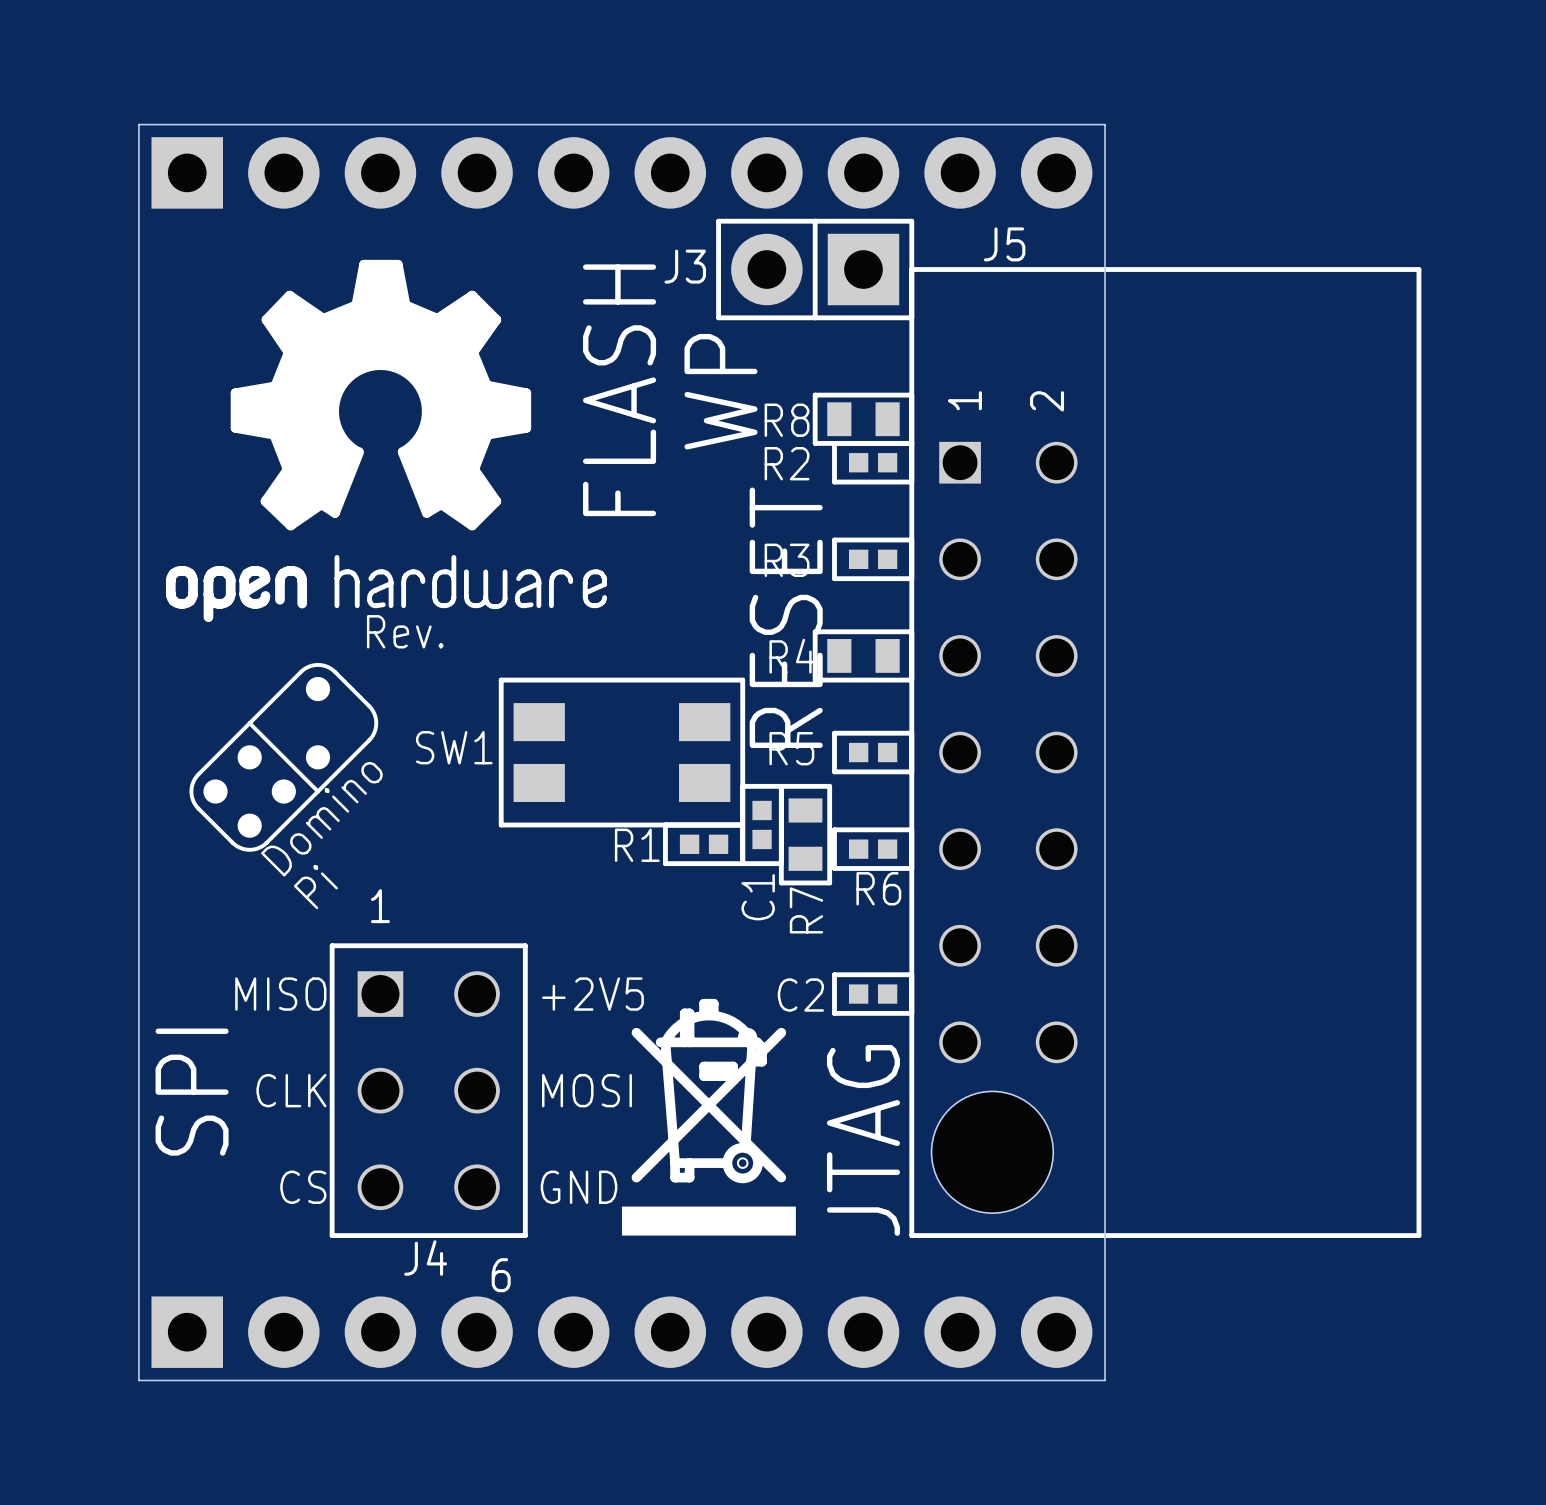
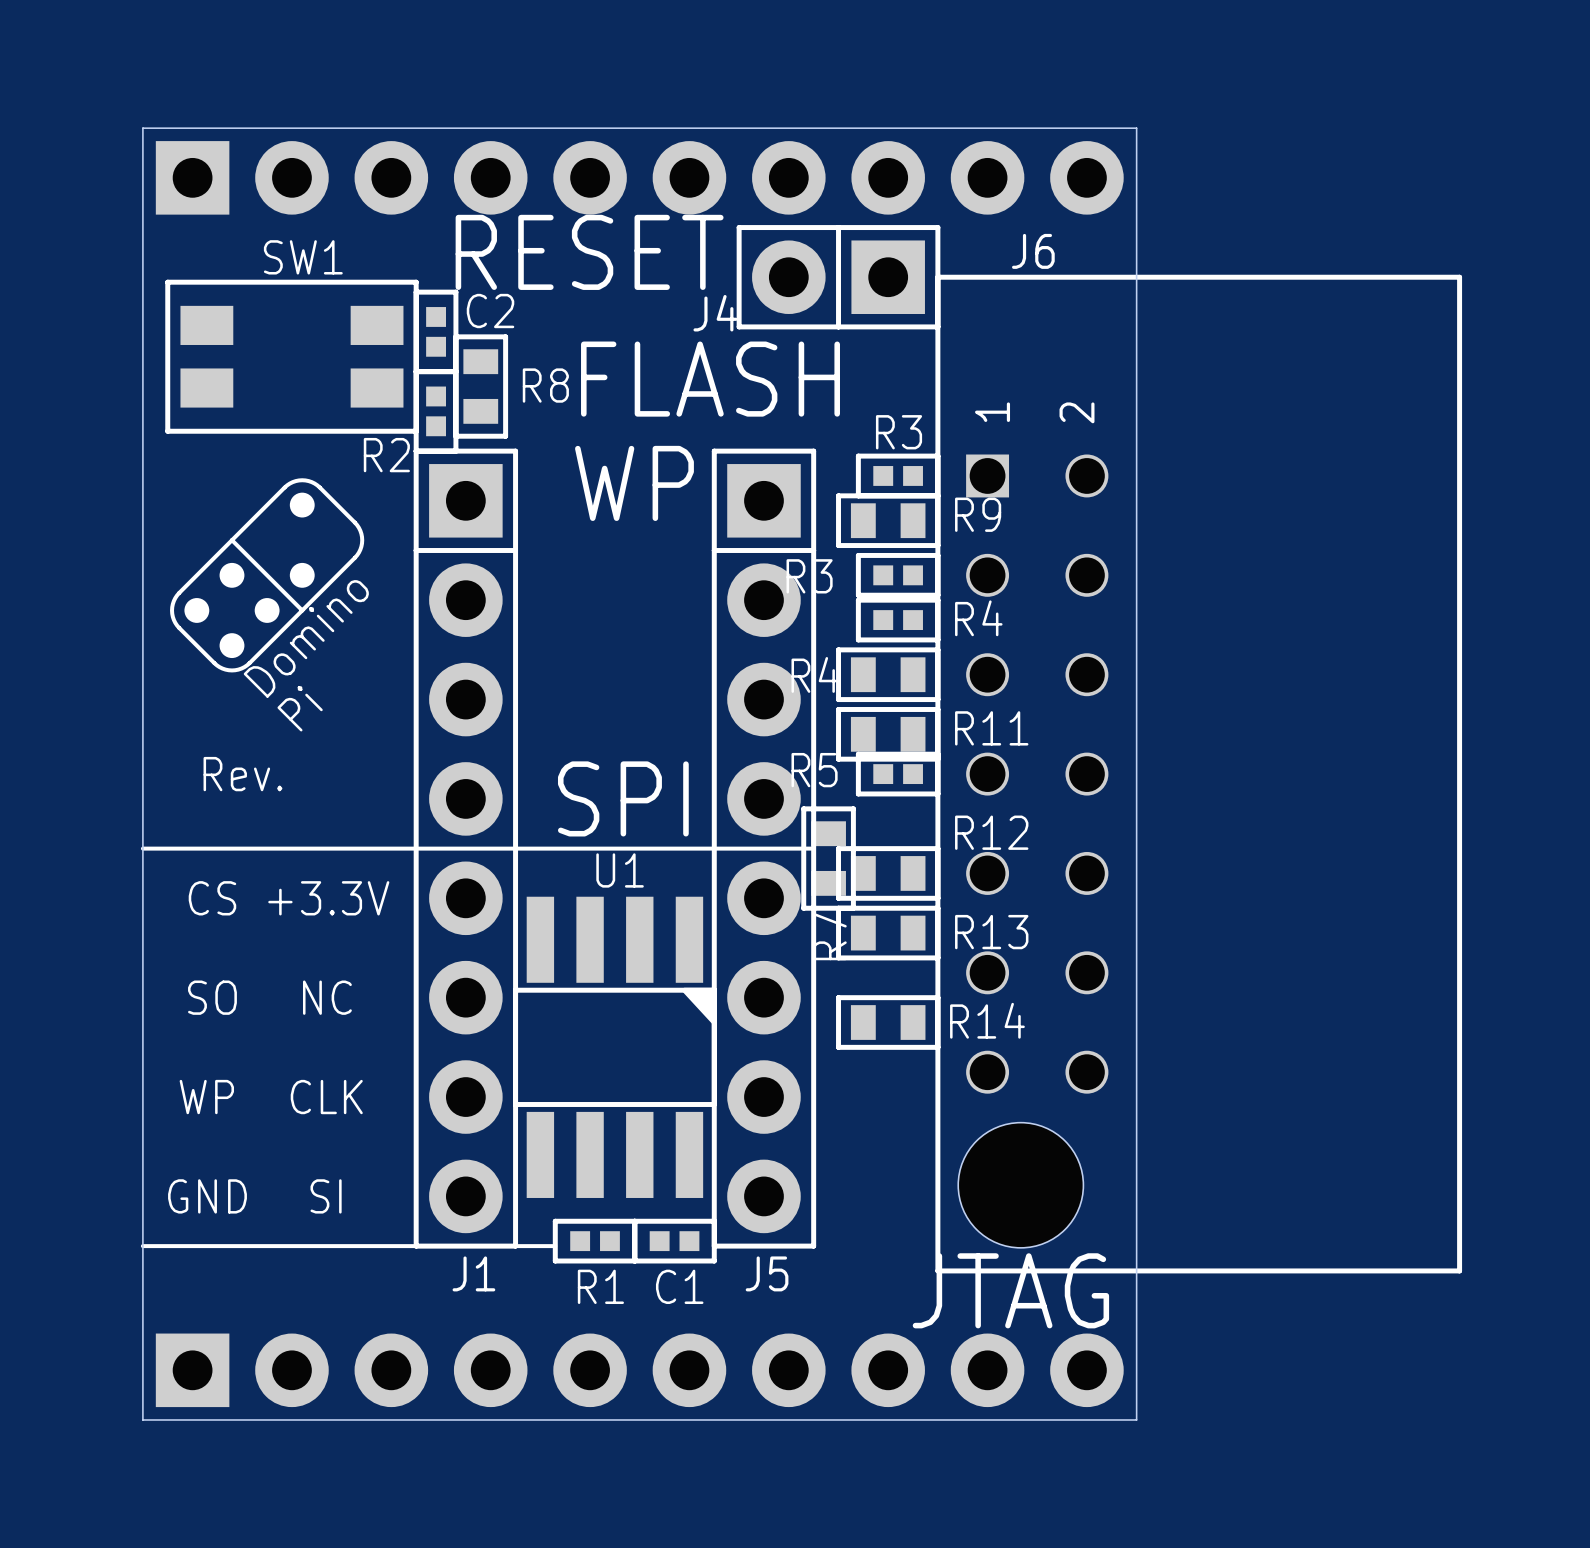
J5 name: J5 (1004, 244) -> J6 (1033, 251)
drawing: [165, 259, 608, 623] -> none
J3 name: J3 (685, 266) -> J4 (715, 313)
text rotation: 0° (619, 390) -> 90° clockwise (710, 379)
text rotation: 0° (720, 391) -> 90° clockwise (634, 483)
R2: none -> (436, 411)
R8 rotation: 0° (863, 419) -> 90° clockwise (480, 386)
R8 position: (863, 419) -> (480, 386)
R8 name position: R8 (787, 420) -> R8 (545, 385)
R2 name: R2 (787, 463) -> R3 (899, 432)
R9: none -> (888, 520)
R4: none -> (898, 620)
text rotation: 0° (786, 617) -> 90° clockwise (589, 252)
text position: RESET (786, 617) -> RESET (589, 252)
text position: Rev. (405, 631) -> Rev. (242, 774)
R11: none -> (888, 734)
SW1 name position: SW1 (454, 747) -> SW1 (303, 257)
SW1 position: (621, 752) -> (291, 356)
drawing position: (283, 757) -> (267, 575)
line: none -> (142, 848) (813, 848)
J1: none -> (465, 848)
J5: none -> (763, 848)
C1 rotation: 0° (762, 824) -> 90° clockwise (674, 1241)
C1 position: (762, 824) -> (674, 1241)
R1 position: (704, 844) -> (595, 1241)
R1 name position: R1 (637, 845) -> R1 (600, 1286)
R12: none -> (888, 873)
R6: (873, 849) -> none
text: none -> +3.3V (328, 898)
R13: none -> (888, 933)
text: none -> SO (212, 997)
text: MISO (280, 994) -> NC (327, 997)
text: +2V5 (592, 994) -> none
R14: none -> (888, 1022)
C2 rotation: 0° (873, 994) -> 90° clockwise (436, 331)
C2 position: (873, 994) -> (436, 331)
C2 name position: C2 (800, 995) -> C2 (490, 311)
drawing: [621, 998, 796, 1236] -> none
U1: none -> (614, 1047)
text: none -> WP (206, 1097)
text position: CLK (291, 1090) -> CLK (326, 1097)
J4: (428, 1090) -> none
text: MOSI (586, 1090) -> none
text rotation: 0° (192, 1092) -> 90° clockwise (623, 798)
text position: SPI (192, 1092) -> SPI (623, 798)
text rotation: 0° (863, 1140) -> 90° clockwise (1010, 1290)
text: none -> SI (326, 1196)
text position: CS (303, 1187) -> CS (212, 898)
text position: GND (579, 1187) -> GND (207, 1196)
line: none -> (142, 1246) (555, 1246)

